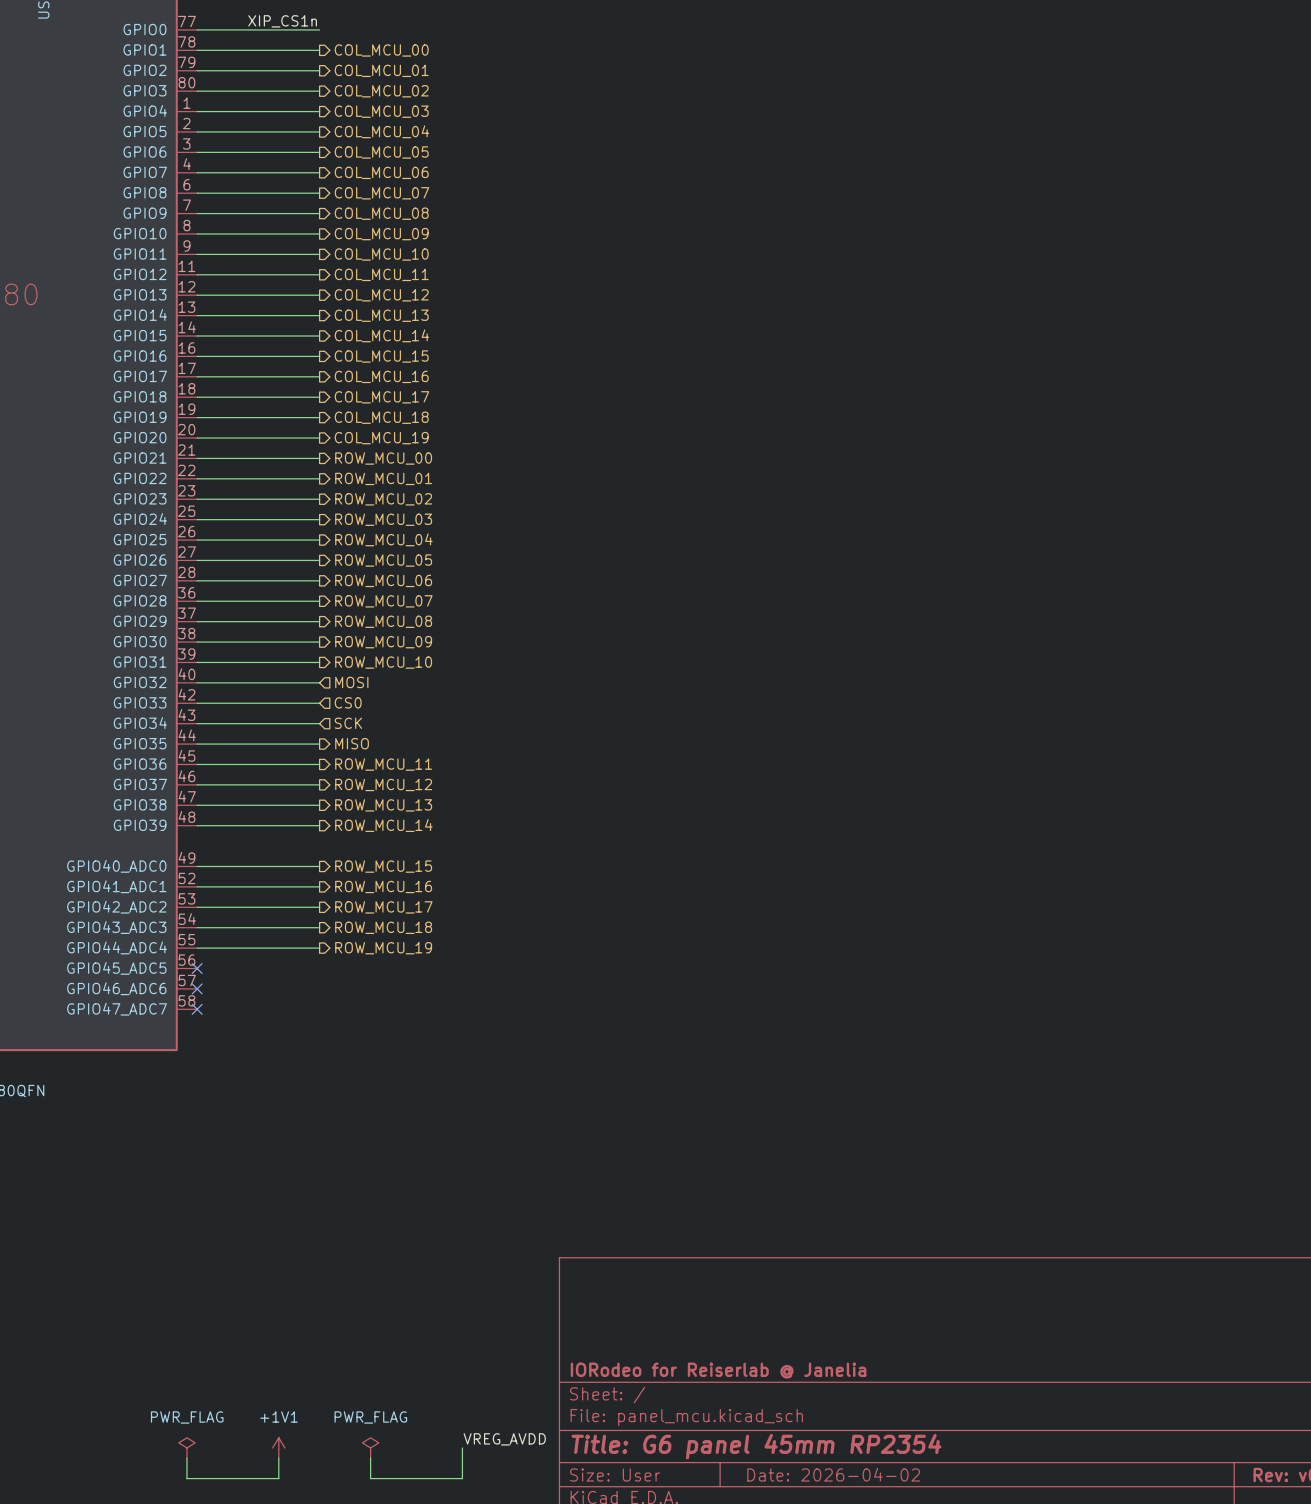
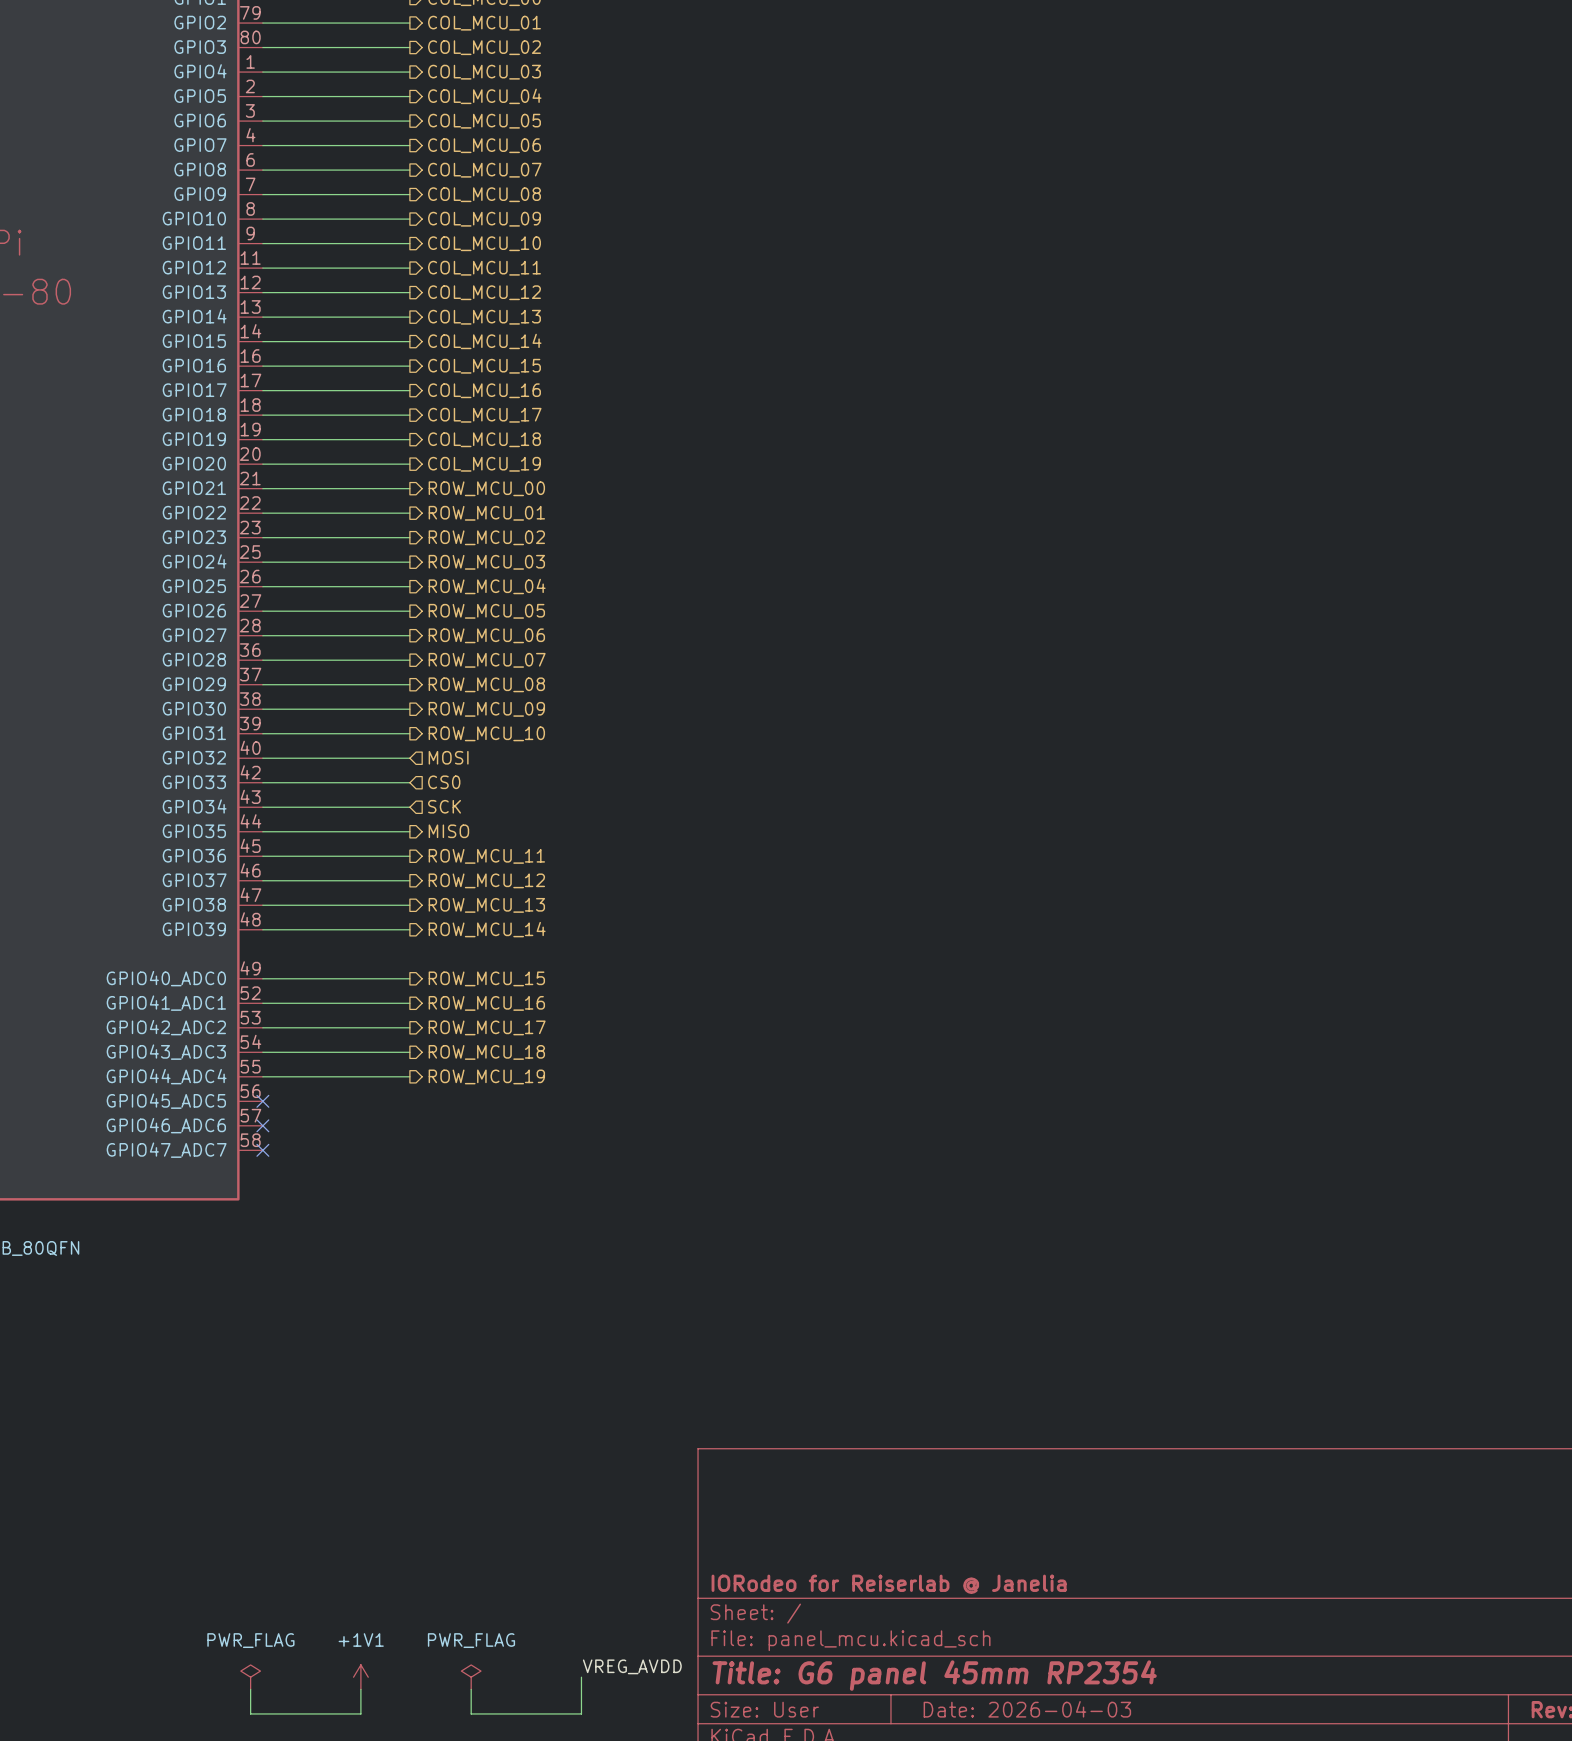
title block: Date: 2026-04-02 (833, 1474) -> Date: 2026-04-03 (1027, 1709)

